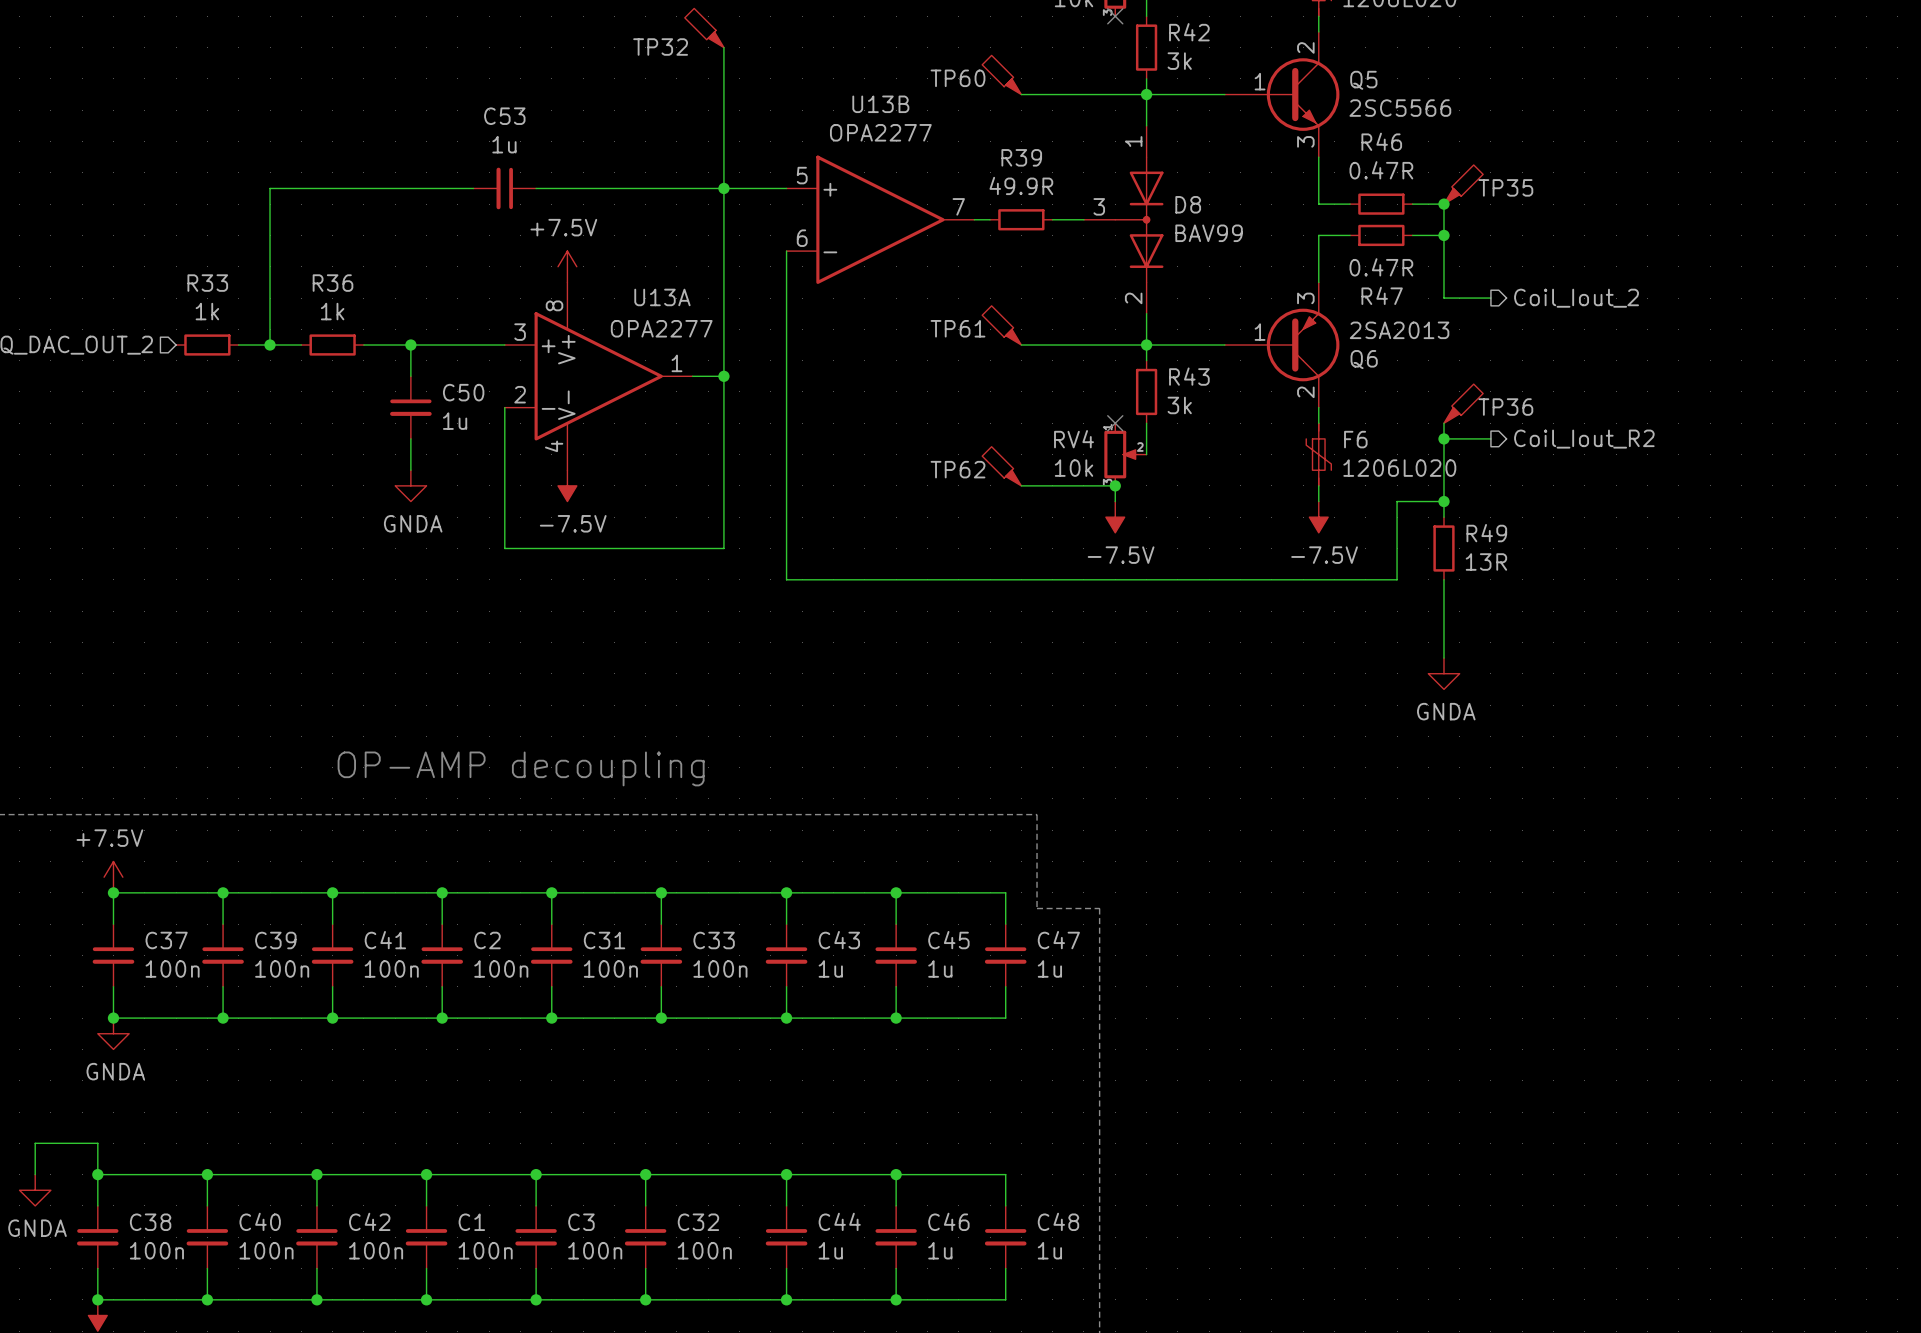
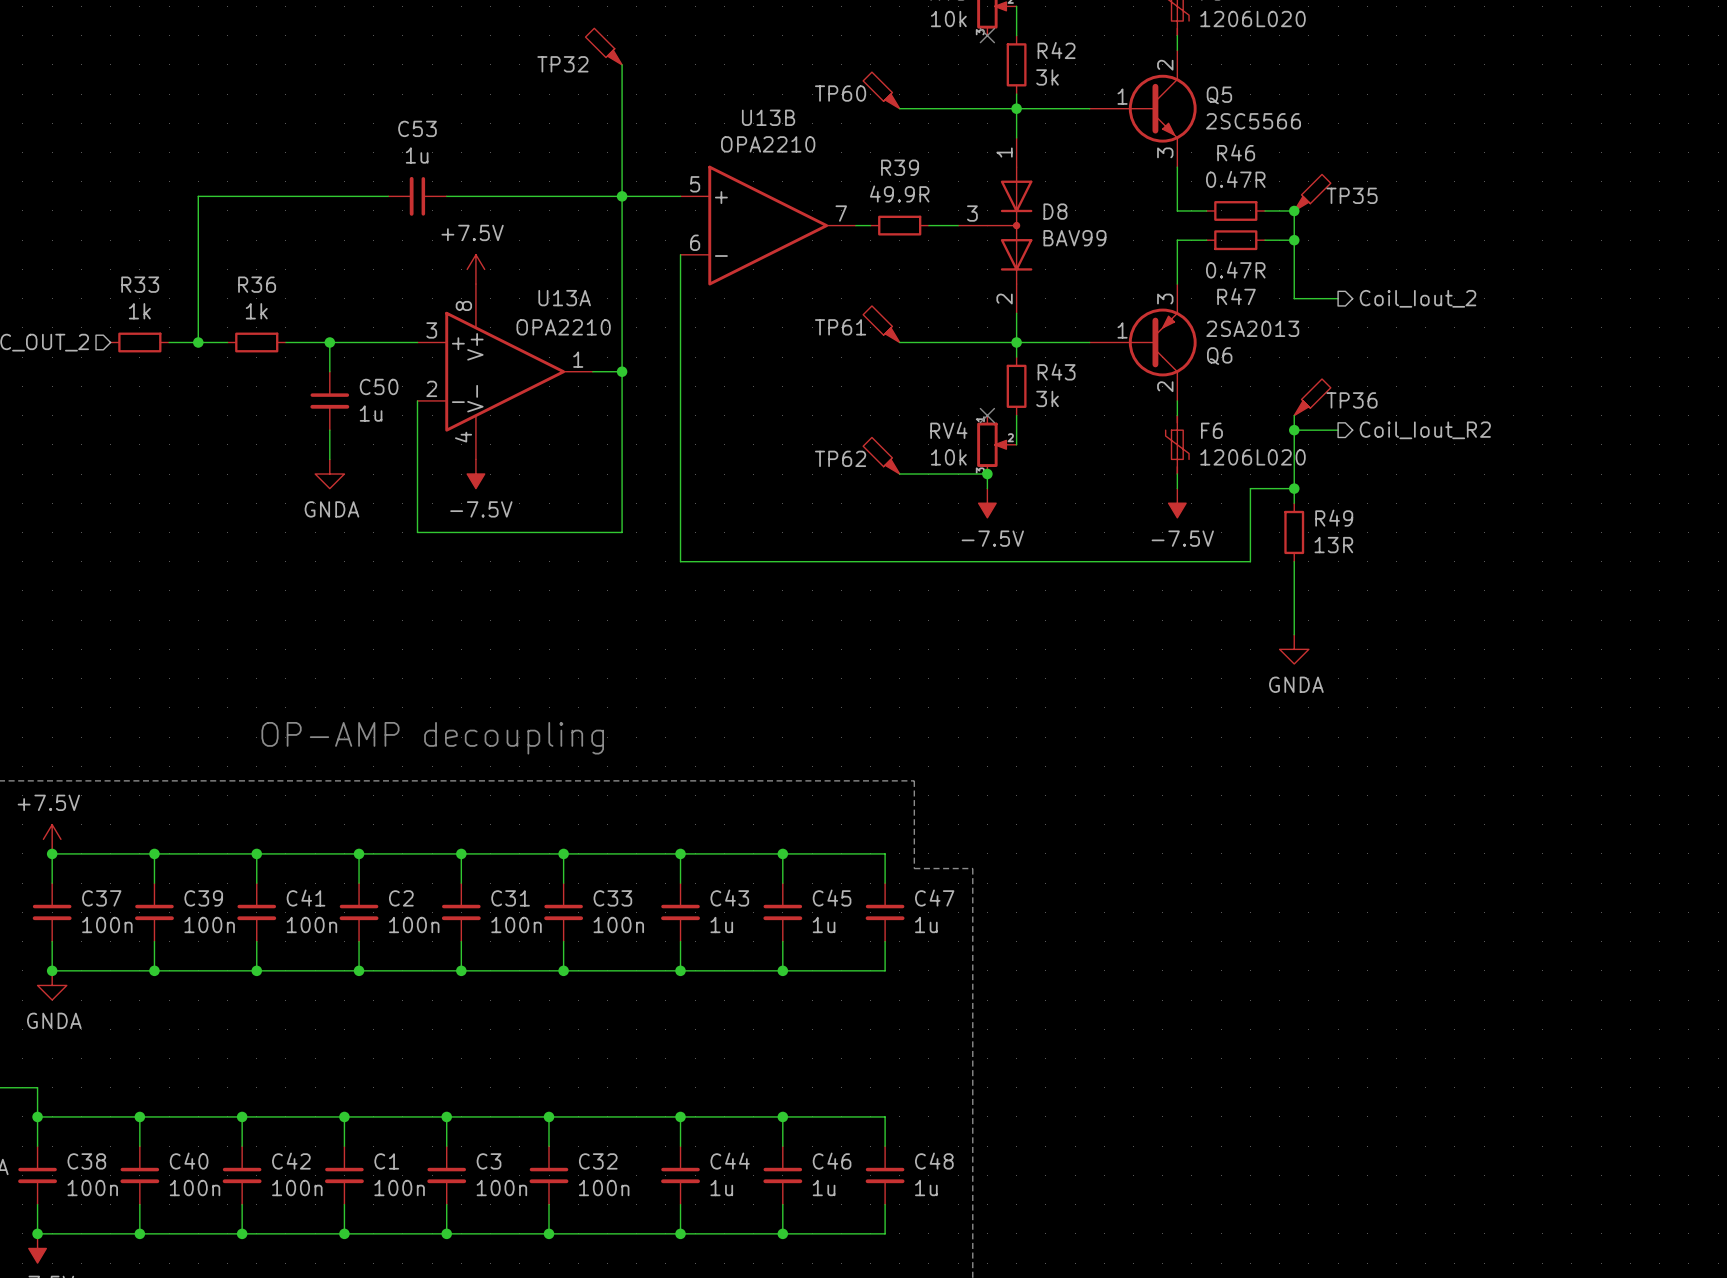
U13B value: OPA2277 (880, 132) -> OPA2210 (768, 144)
U13A value: OPA2277 (661, 328) -> OPA2210 (563, 327)

